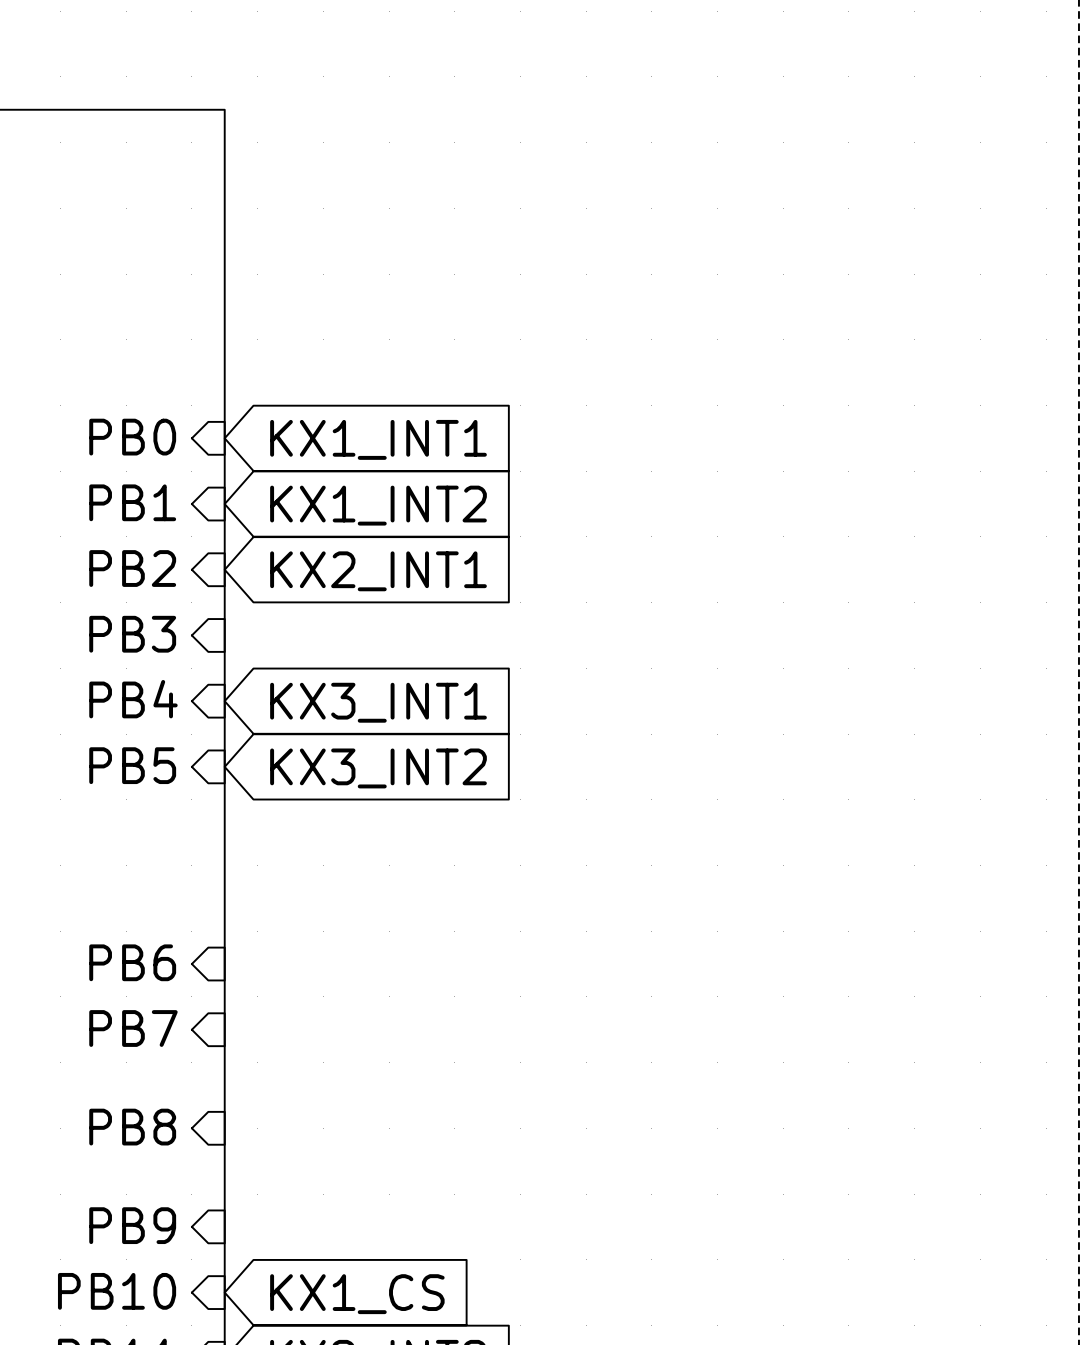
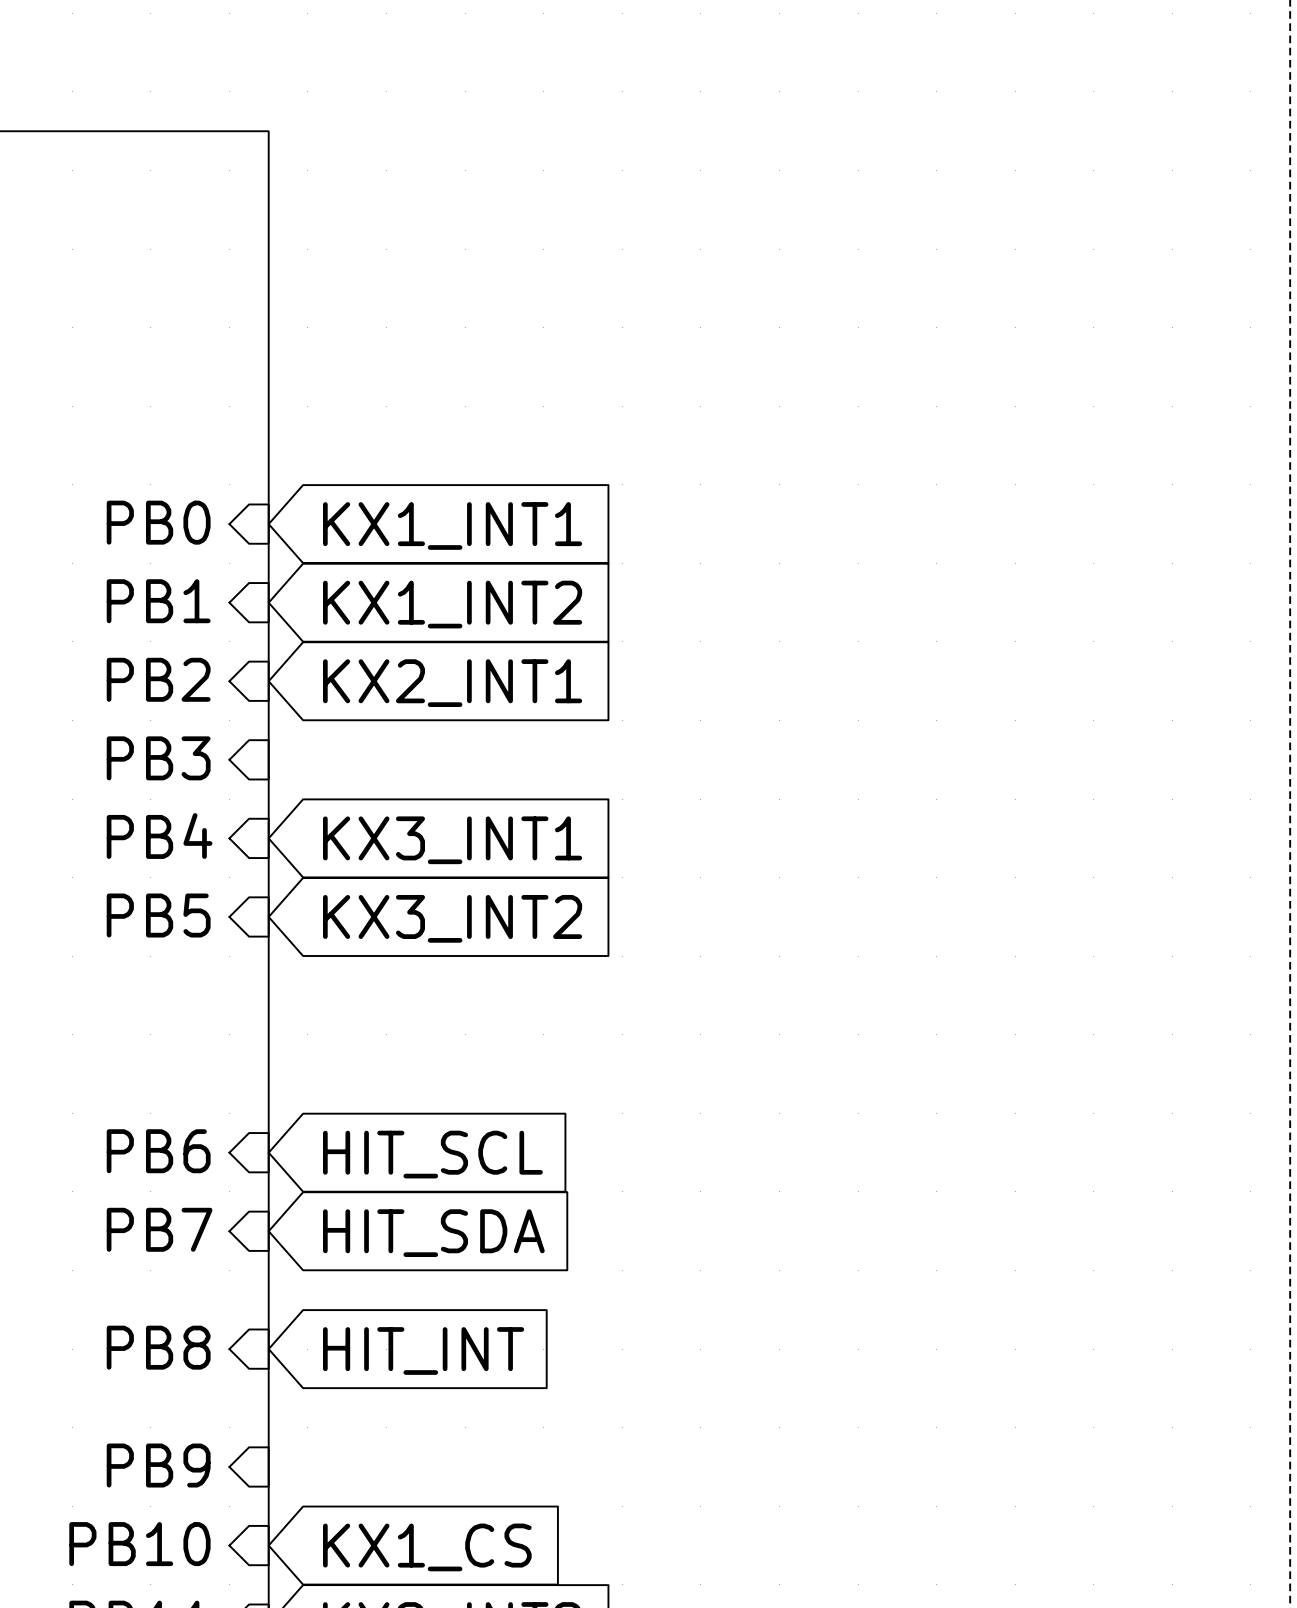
global label: none -> HIT_SCL (432, 1154)
global label: none -> HIT_SDA (433, 1233)
global label: none -> HIT_INT (423, 1351)

